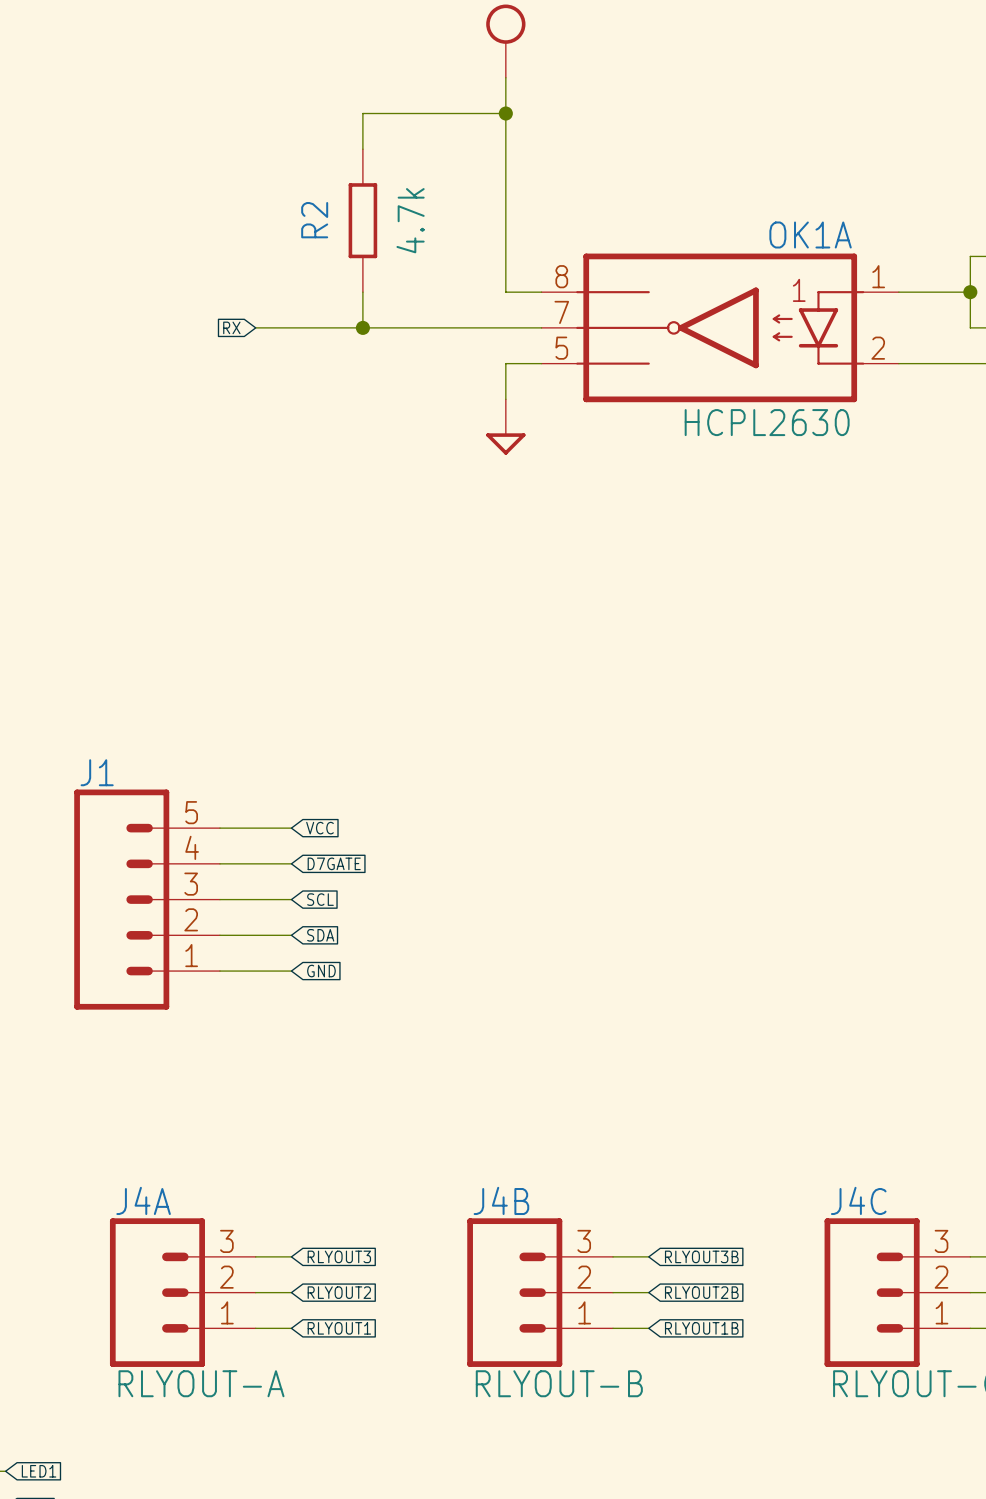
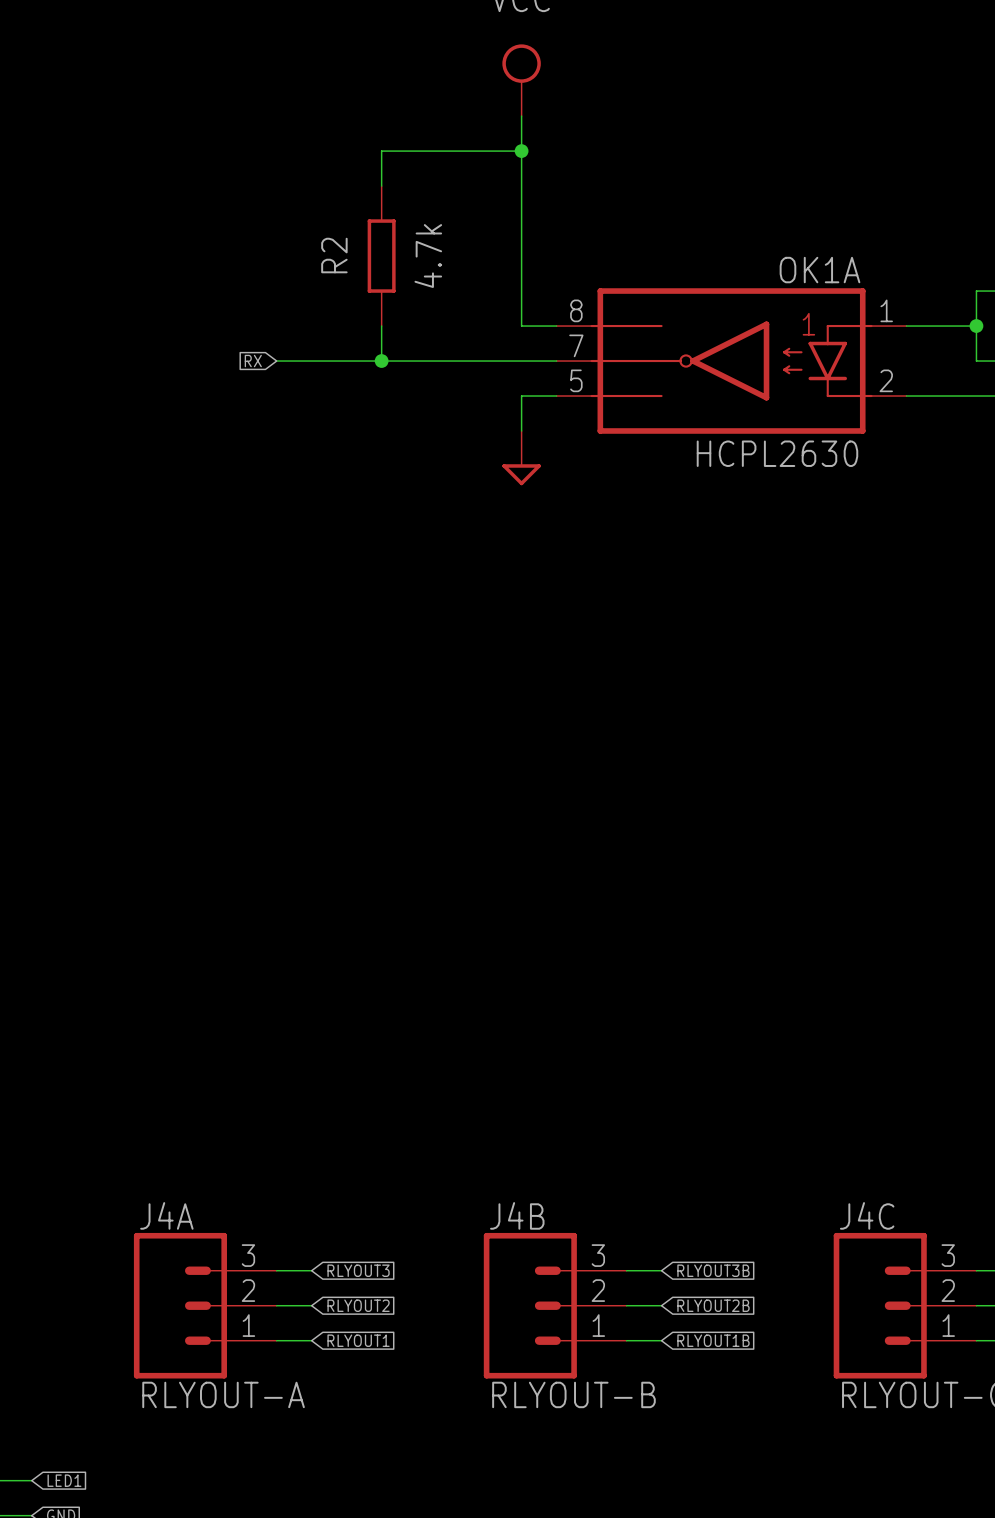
wire: (219, 828) (291, 828) -> none
global label: VCC (319, 828) -> none
wire: (219, 863) (291, 863) -> none
global label: D7GATE (334, 863) -> none
J1: (147, 899) -> none
wire: (219, 899) (291, 899) -> none
global label: SCL (320, 899) -> none
wire: (219, 935) (291, 935) -> none
global label: SDA (320, 935) -> none
wire: (219, 971) (291, 971) -> none
global label: GND (321, 971) -> none

